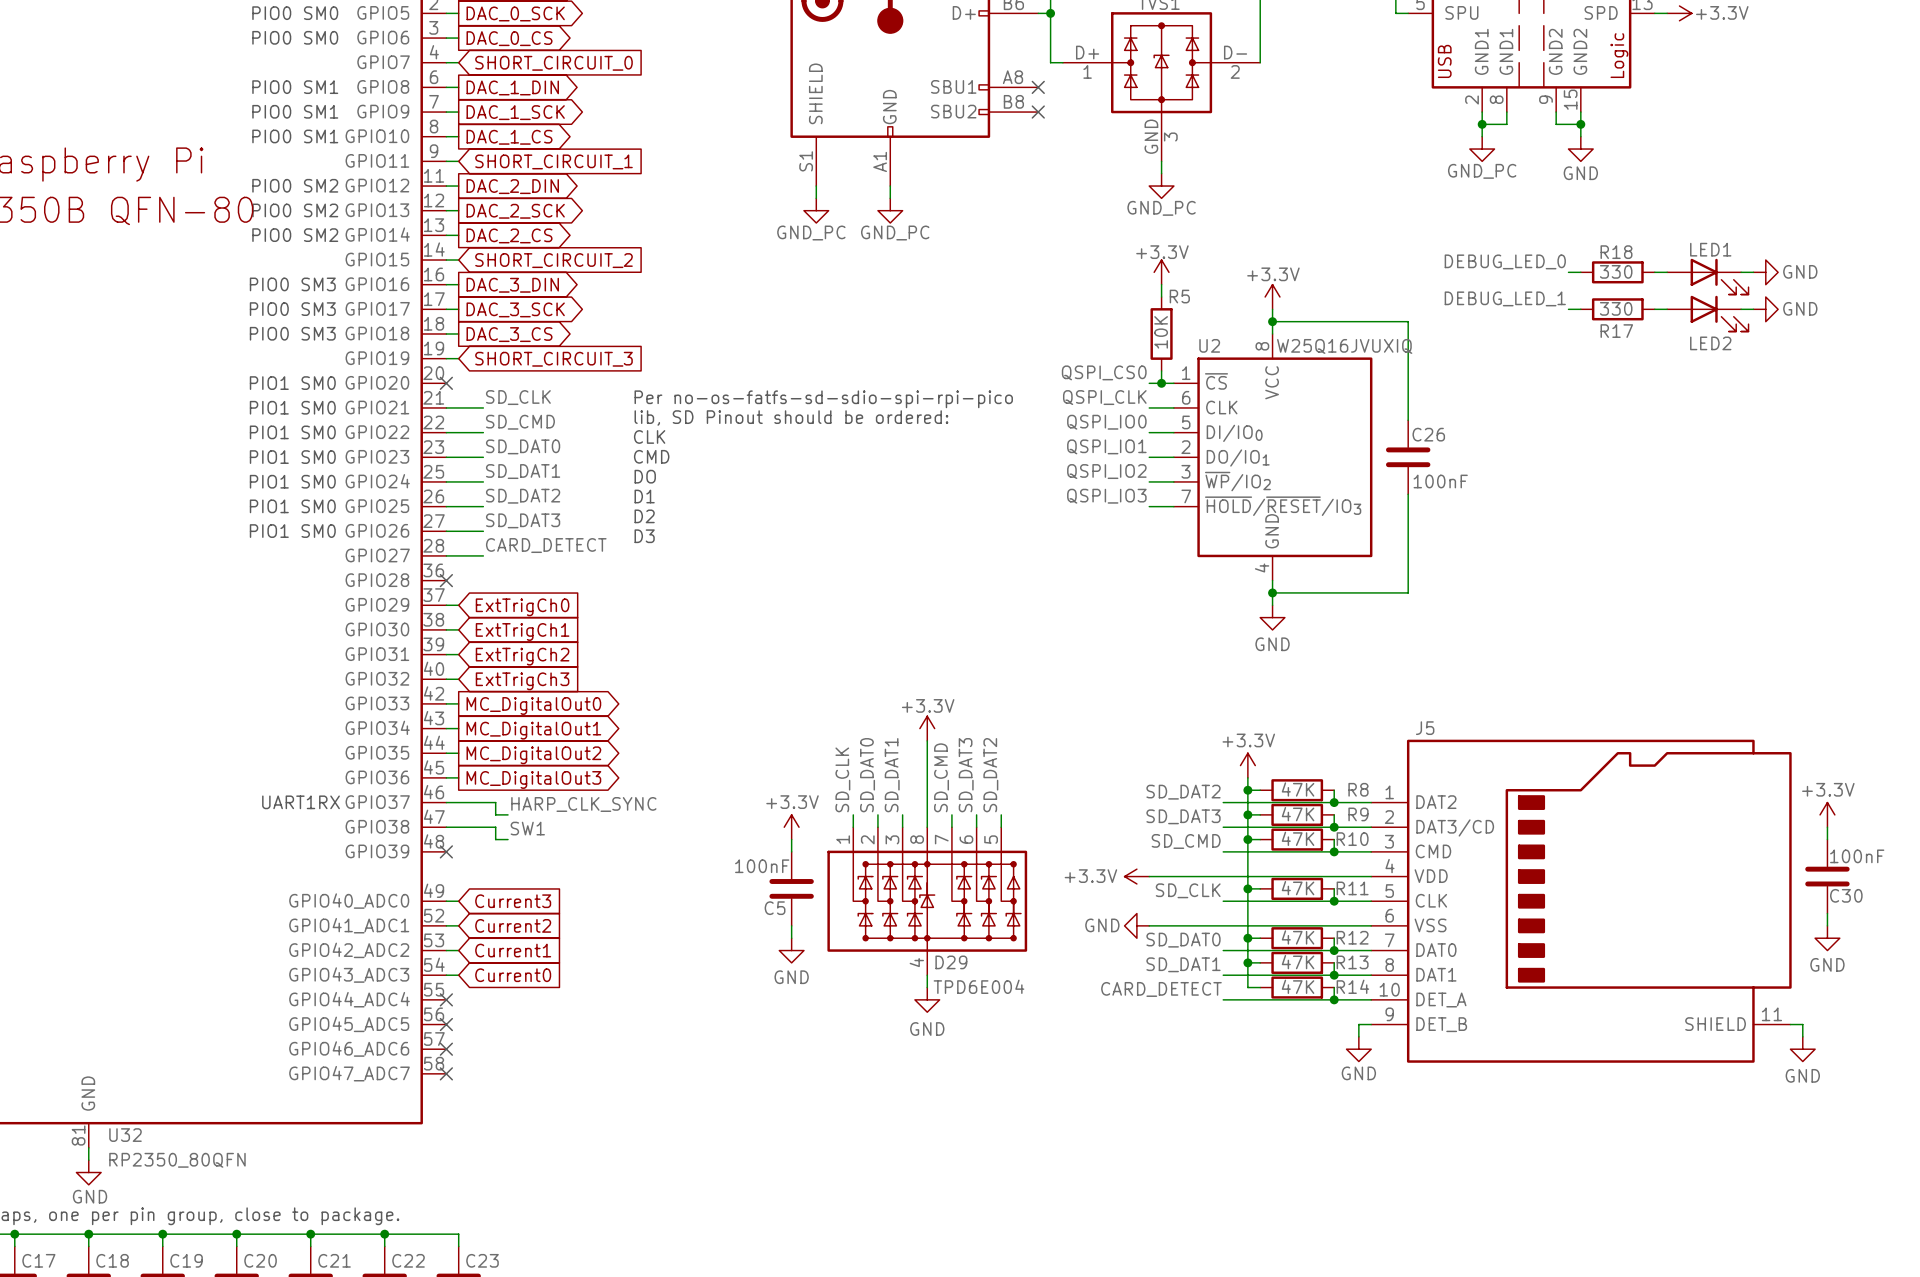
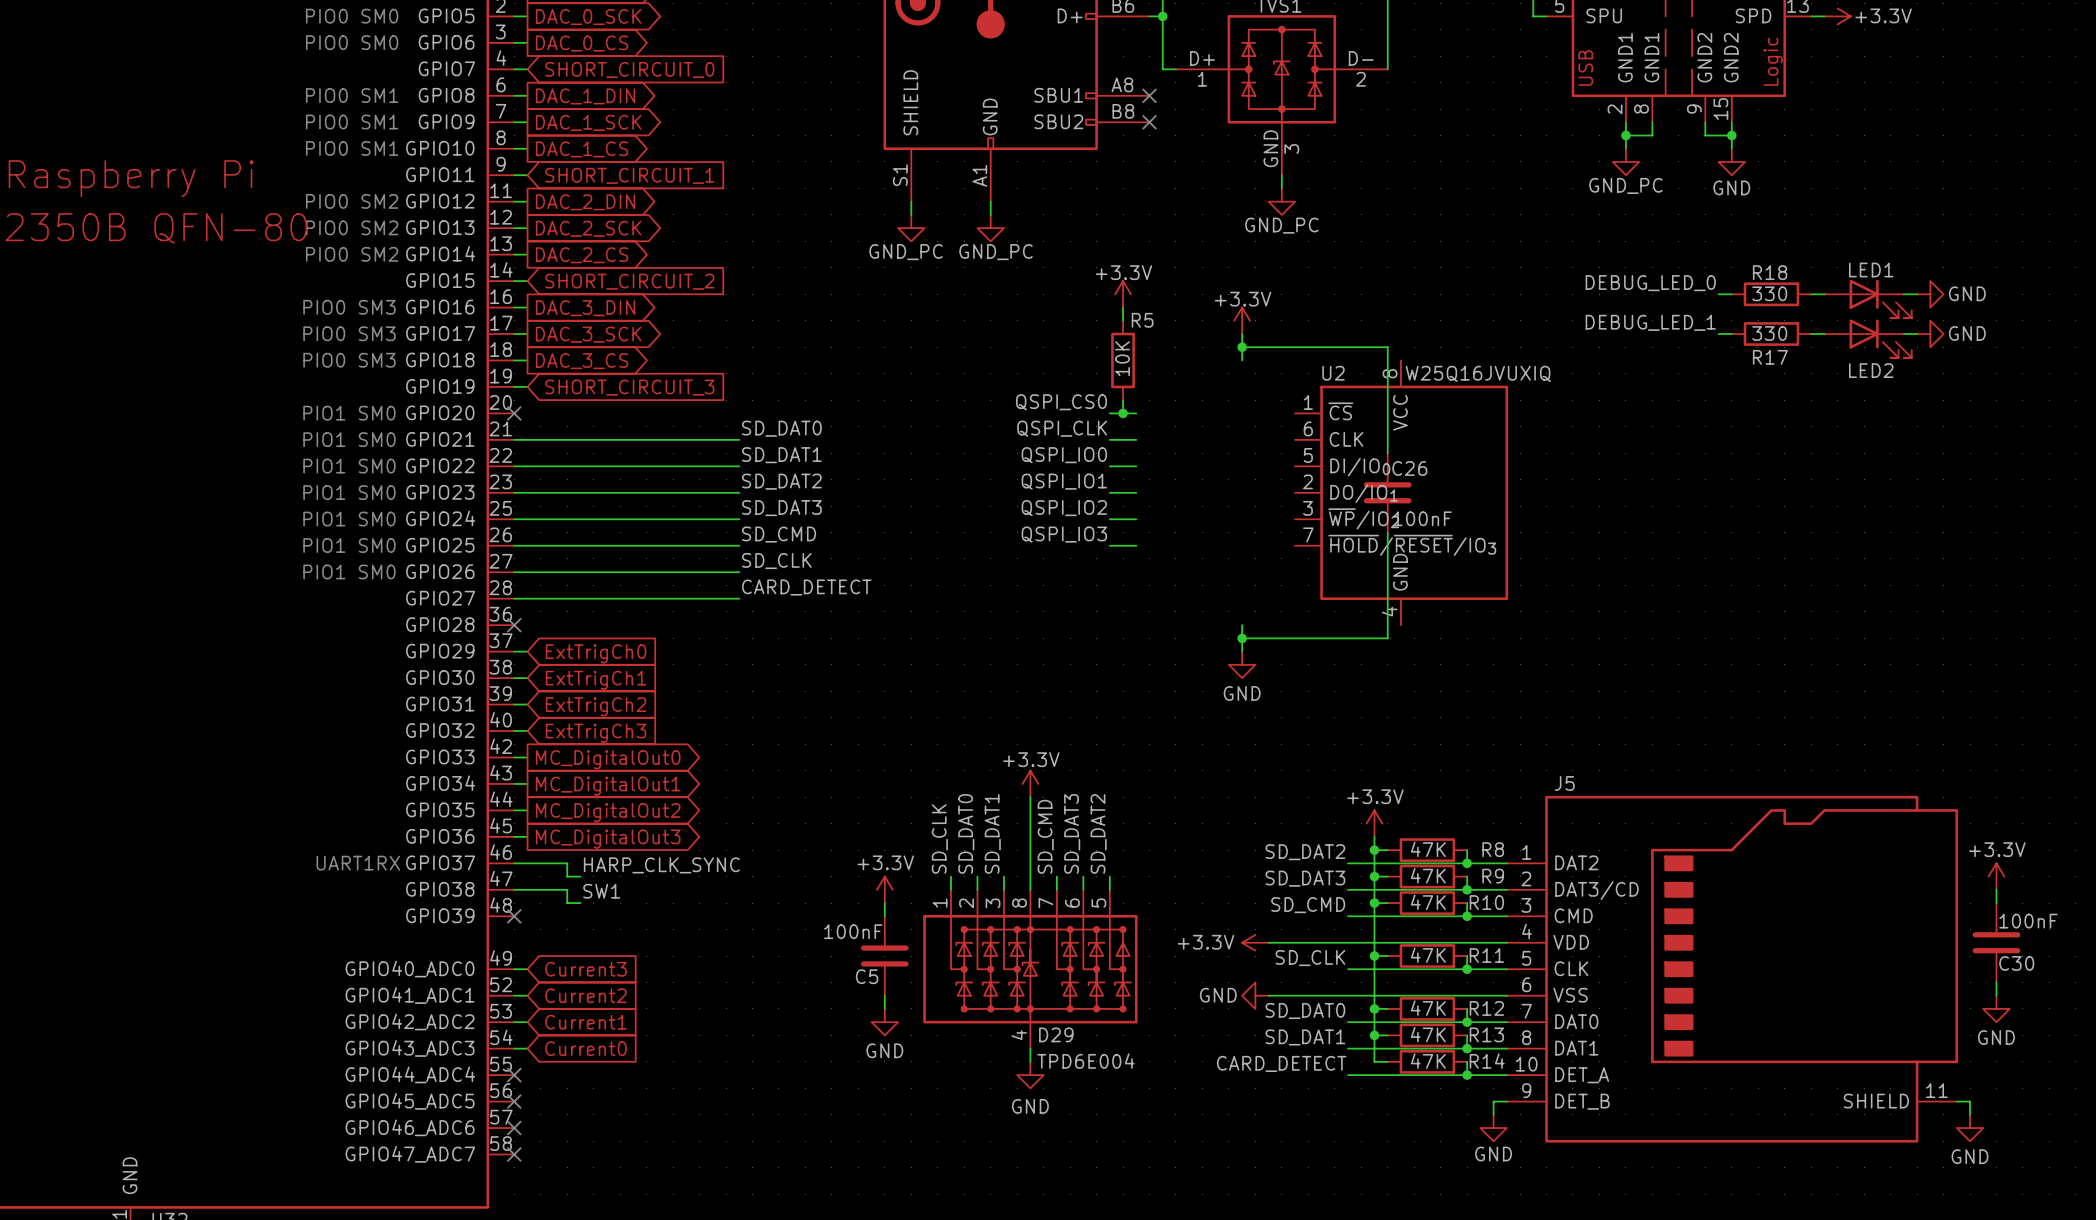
power symbol: none -> +3.3V (1123, 294)
power symbol position: +3.3V (1161, 272) -> +3.3V (1242, 320)
wire: (1161, 284) (1161, 297) -> (1123, 307) (1123, 320)
power symbol: +3.3V (1272, 297) -> none
wire: (1272, 309) (1272, 333) -> (1242, 334) (1242, 360)
junction: none -> (1242, 347)
wire: (1272, 321) (1408, 321) (1408, 420) -> (1242, 347) (1387, 347) (1387, 453)
junction: (1272, 321) -> none
R5 position: (1161, 333) -> (1123, 360)
wire: (1161, 370) (1161, 383) -> (1123, 400) (1123, 413)
label position: QSPI_CS0 (1104, 372) -> QSPI_CS0 (1061, 402)
junction: none -> (1123, 413)
wire: (1149, 383) (1173, 383) -> (1109, 413) (1136, 413)
junction: (1161, 383) -> none
label position: SD_CLK (518, 397) -> SD_CLK (776, 561)
label position: QSPI_CLK (1104, 397) -> QSPI_CLK (1062, 428)
text: Per no-os-fatfs-sd-sdio-spi-rpi-pico (823, 399) -> none
wire: none -> (553, 439) (739, 439)
wire: (1149, 407) (1173, 407) -> (1109, 439) (1136, 439)
text: lib, SD Pinout should be ordered: (791, 417) -> none
label position: SD_CMD (520, 422) -> SD_CMD (779, 534)
label position: QSPI_IO0 (1106, 422) -> QSPI_IO0 (1064, 455)
wire: none -> (553, 466) (739, 466)
wire: (1149, 432) (1173, 432) -> (1109, 466) (1136, 466)
text: CLK (649, 436) -> none
label position: SD_DAT0 (523, 446) -> SD_DAT0 (781, 428)
label position: QSPI_IO1 (1106, 446) -> QSPI_IO1 (1064, 481)
text: CMD (651, 456) -> none
wire: none -> (553, 492) (739, 492)
wire: (1149, 457) (1173, 457) -> (1109, 492) (1136, 492)
C26 position: (1408, 457) -> (1387, 492)
label position: SD_DAT1 (523, 471) -> SD_DAT1 (781, 455)
label position: QSPI_IO2 (1106, 471) -> QSPI_IO2 (1064, 508)
text: DO (645, 476) -> none
wire: none -> (553, 519) (739, 519)
wire: (1149, 481) (1173, 481) -> (1109, 519) (1136, 519)
wire: (1408, 494) (1408, 592) (1272, 592) -> (1387, 532) (1387, 638) (1242, 638)
label position: SD_DAT2 (523, 496) -> SD_DAT2 (781, 481)
text: D1 (644, 496) -> none
label position: QSPI_IO3 (1106, 496) -> QSPI_IO3 (1064, 534)
wire: none -> (553, 545) (739, 545)
wire: (1149, 506) (1173, 506) -> (1109, 545) (1136, 545)
text: D2 (644, 516) -> none
label position: SD_DAT3 (523, 520) -> SD_DAT3 (781, 508)
wire: none -> (553, 572) (739, 572)
text: D3 (644, 536) -> none
label position: CARD_DETECT (546, 545) -> CARD_DETECT (806, 587)
wire: none -> (553, 598) (739, 598)
wire: (1272, 580) (1272, 605) -> (1242, 625) (1242, 651)
junction: none -> (1242, 638)
junction: (1272, 592) -> none
power symbol position: GND (1272, 617) -> GND (1242, 664)

